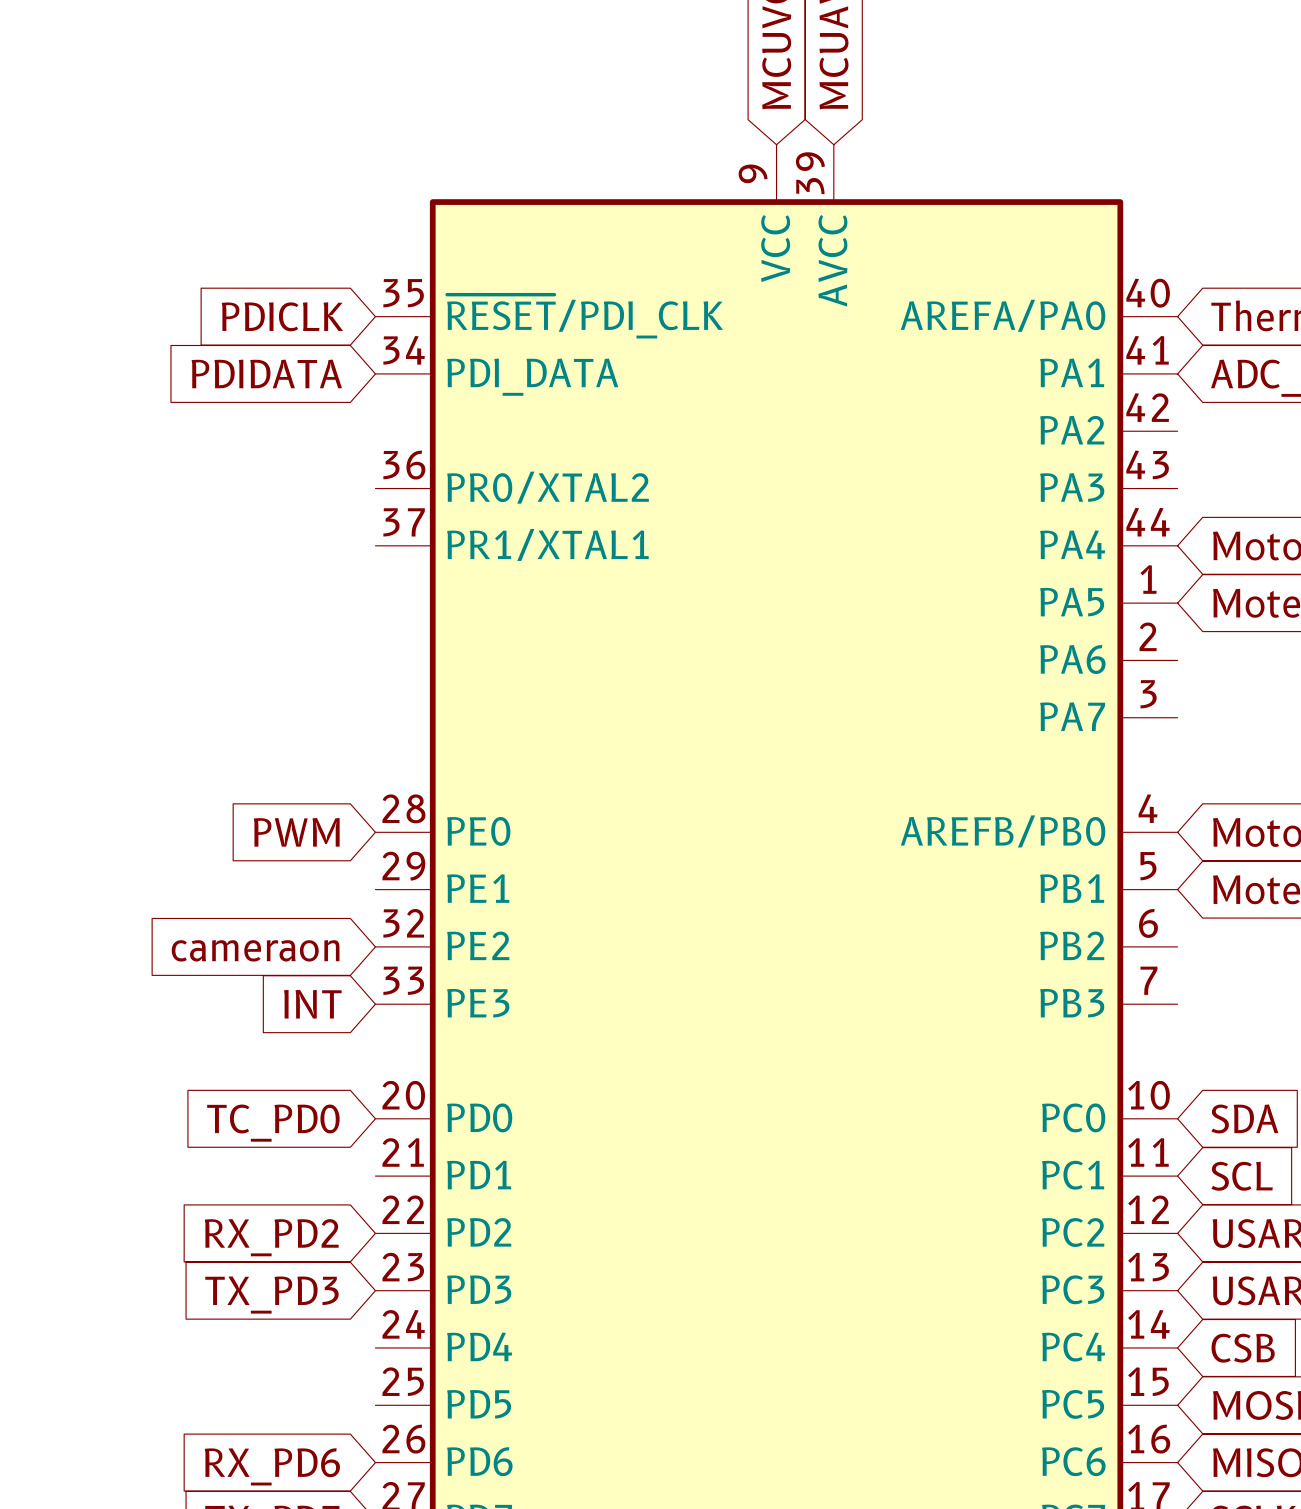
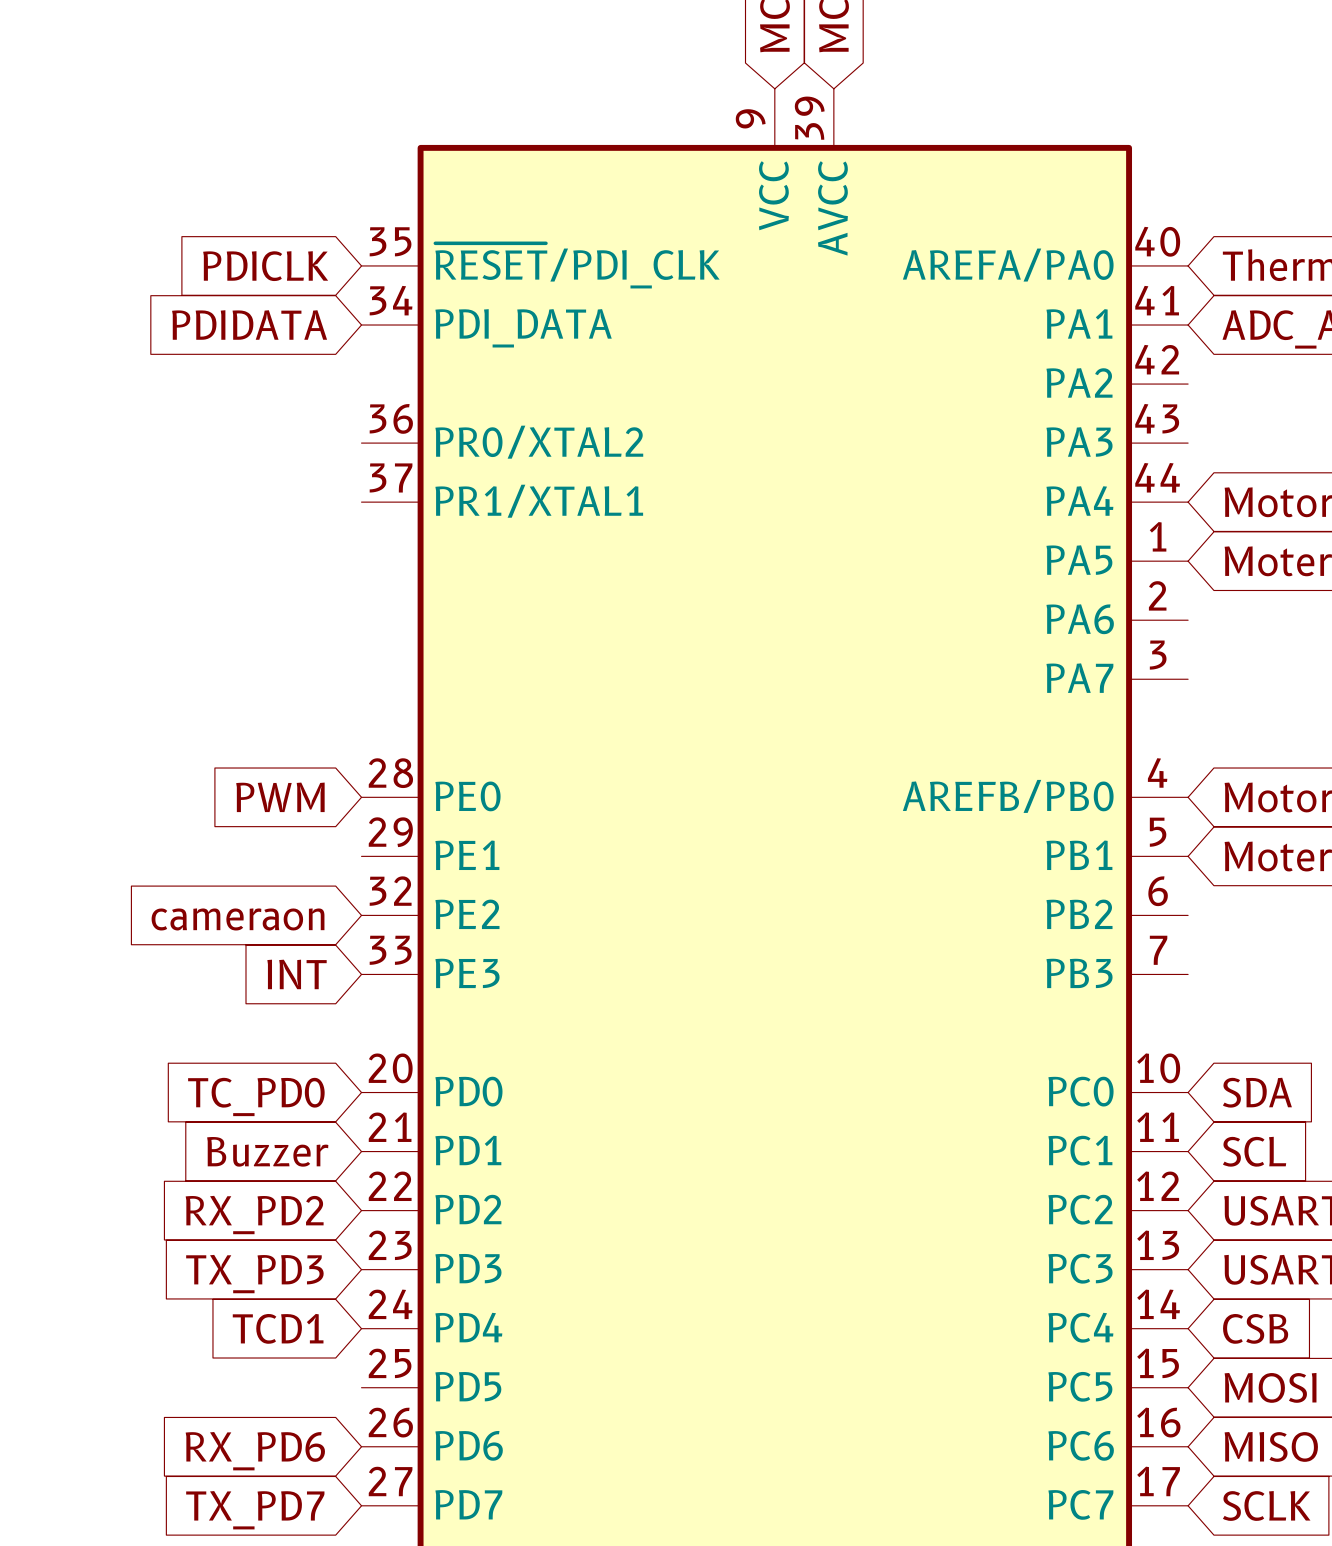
global label: none -> Buzzer (267, 1151)
global label: none -> TCD1 (278, 1328)

